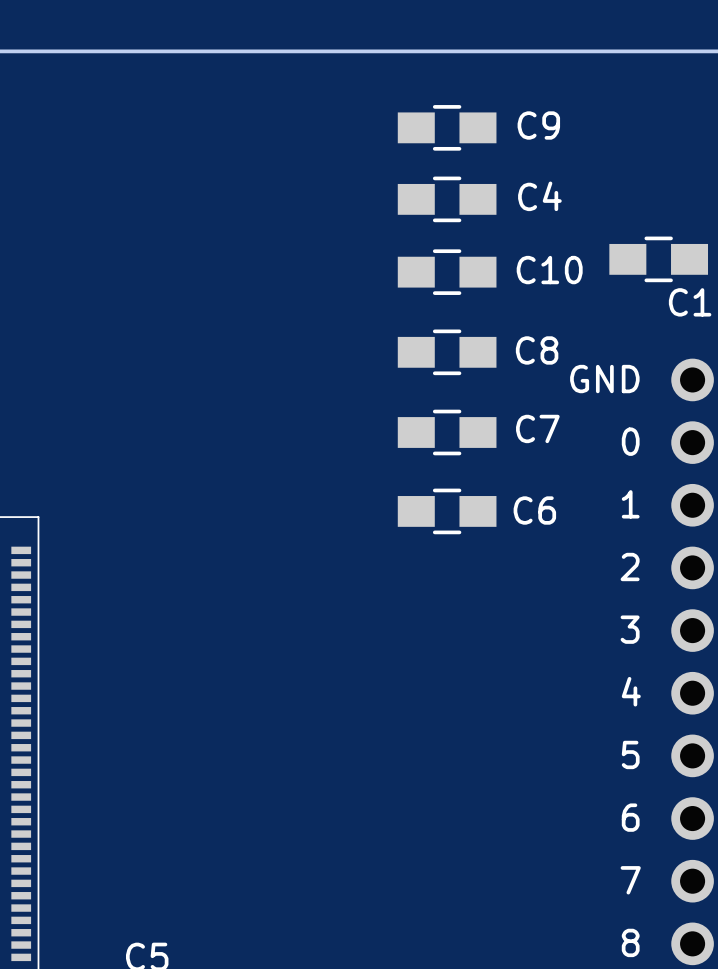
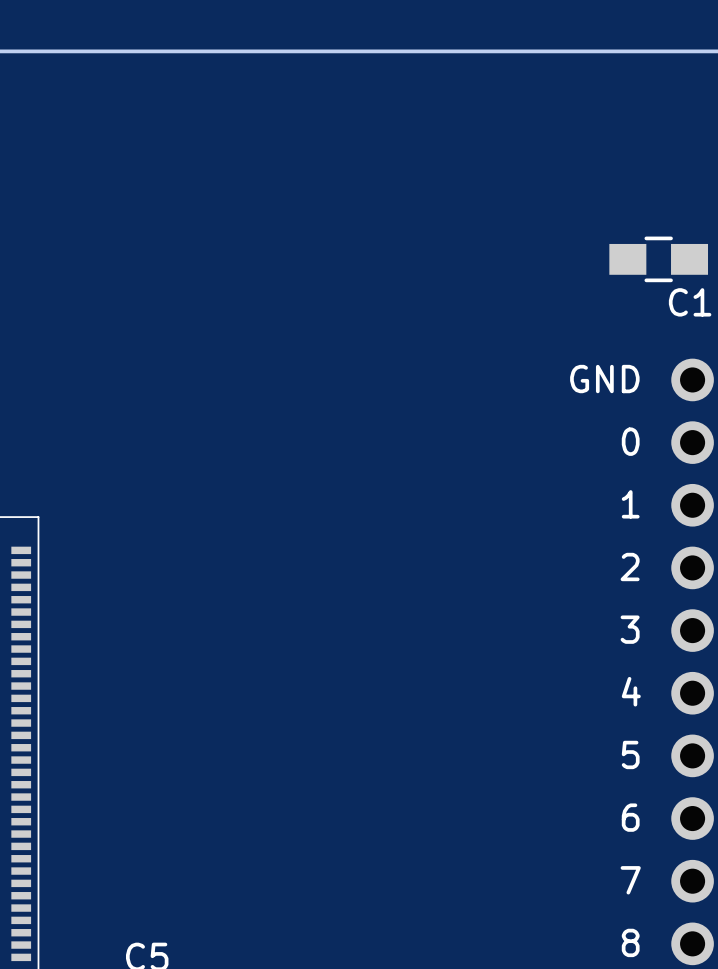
C9: (447, 127) -> none
C4: (447, 199) -> none
C10: (447, 272) -> none
C8: (447, 352) -> none
C7: (447, 432) -> none
C6: (447, 511) -> none

